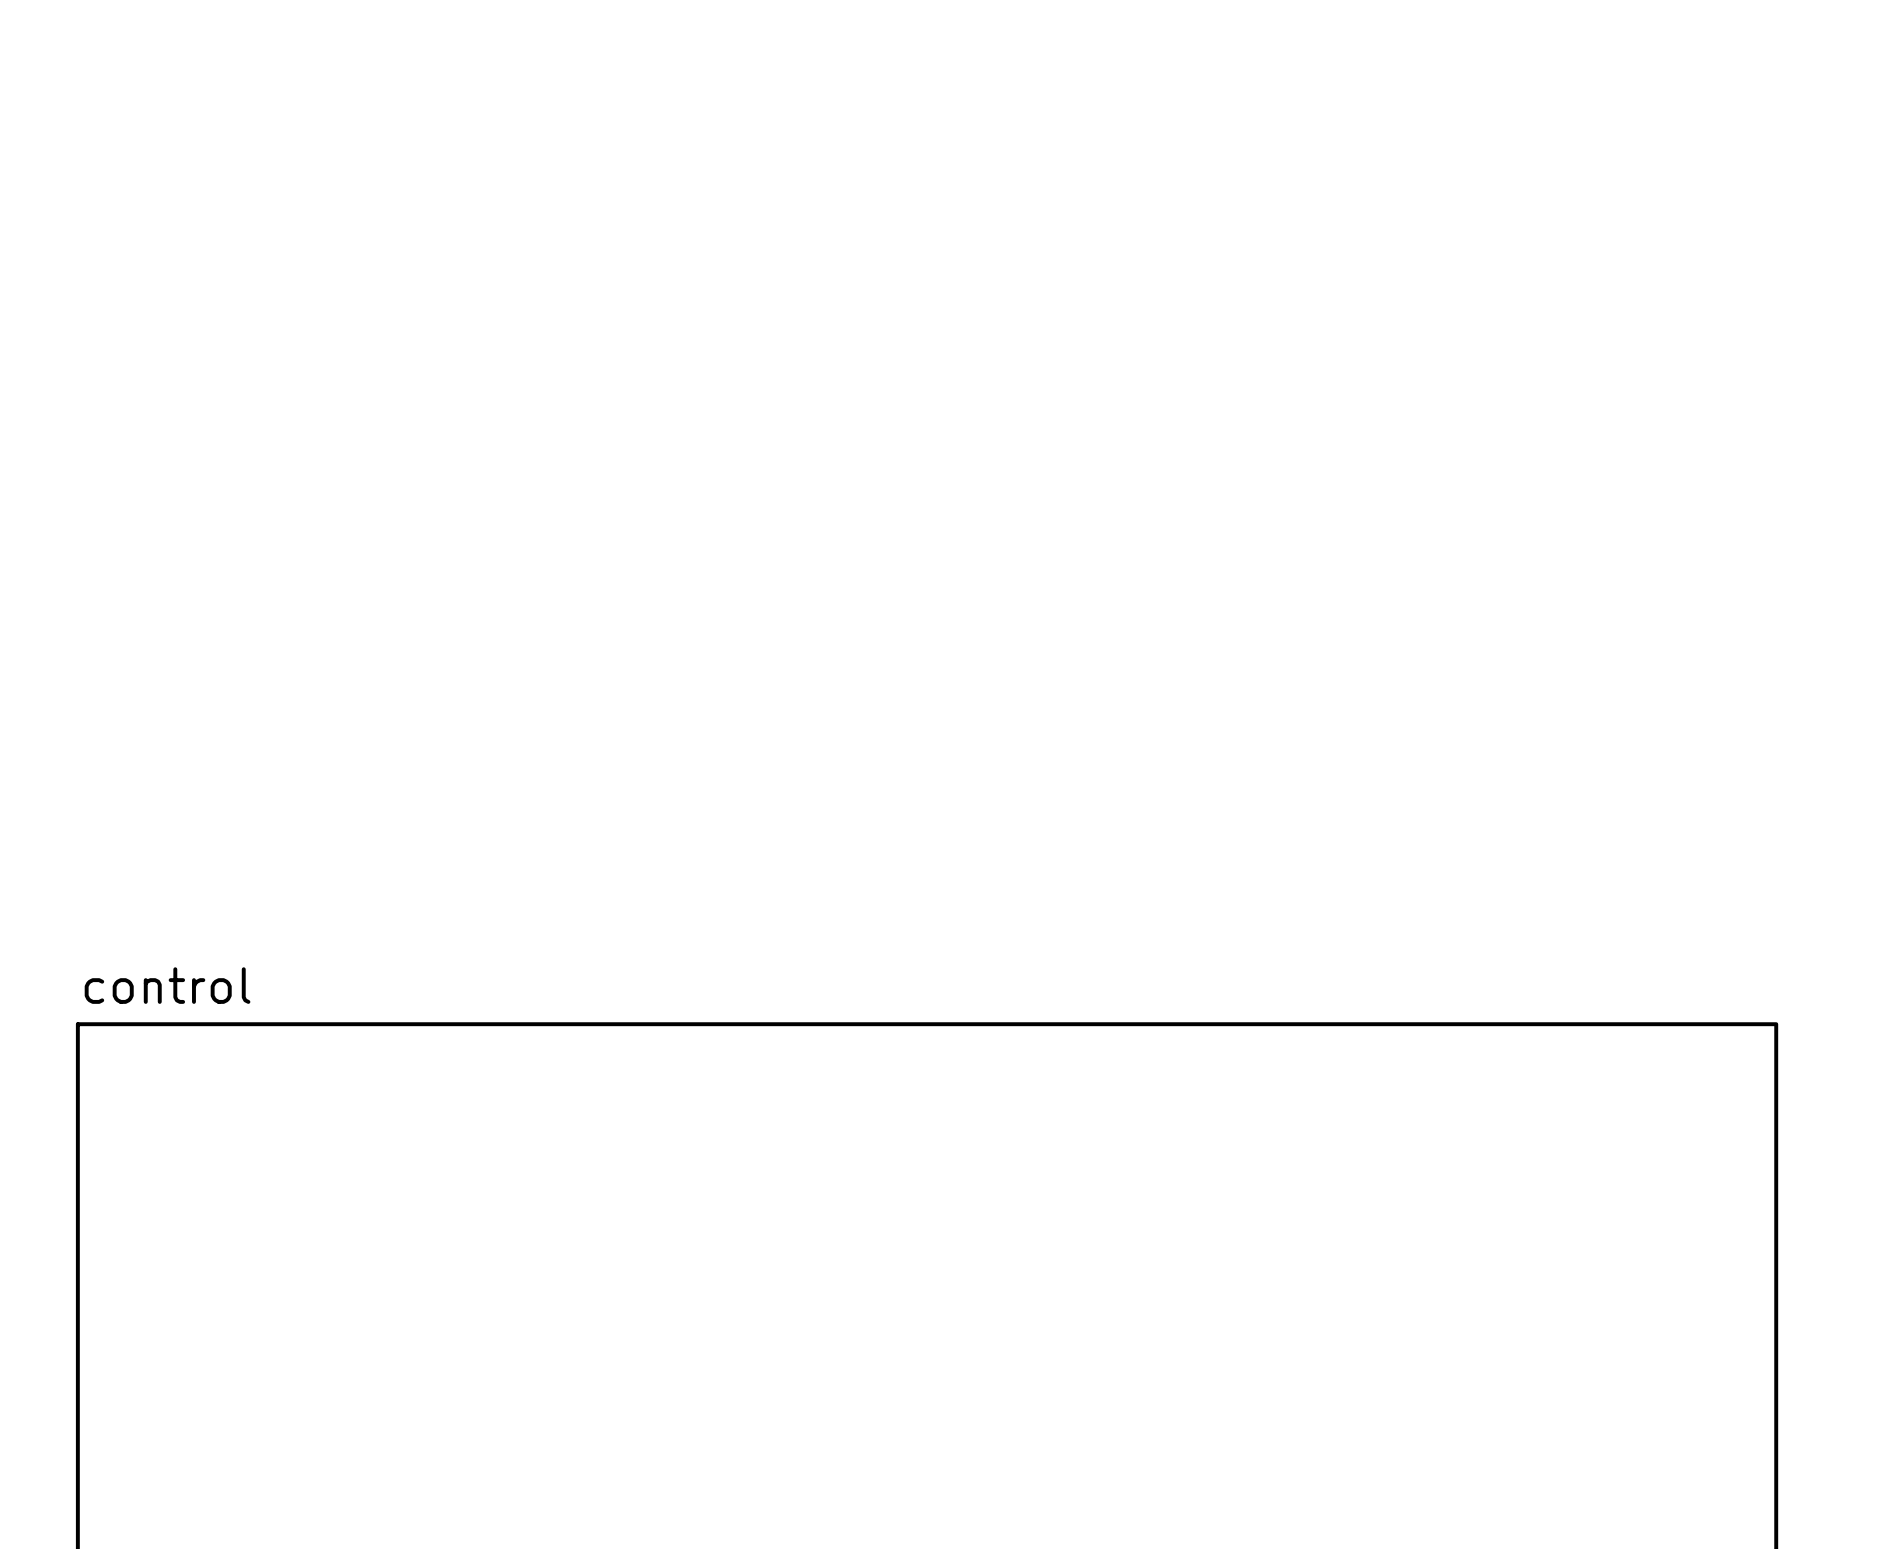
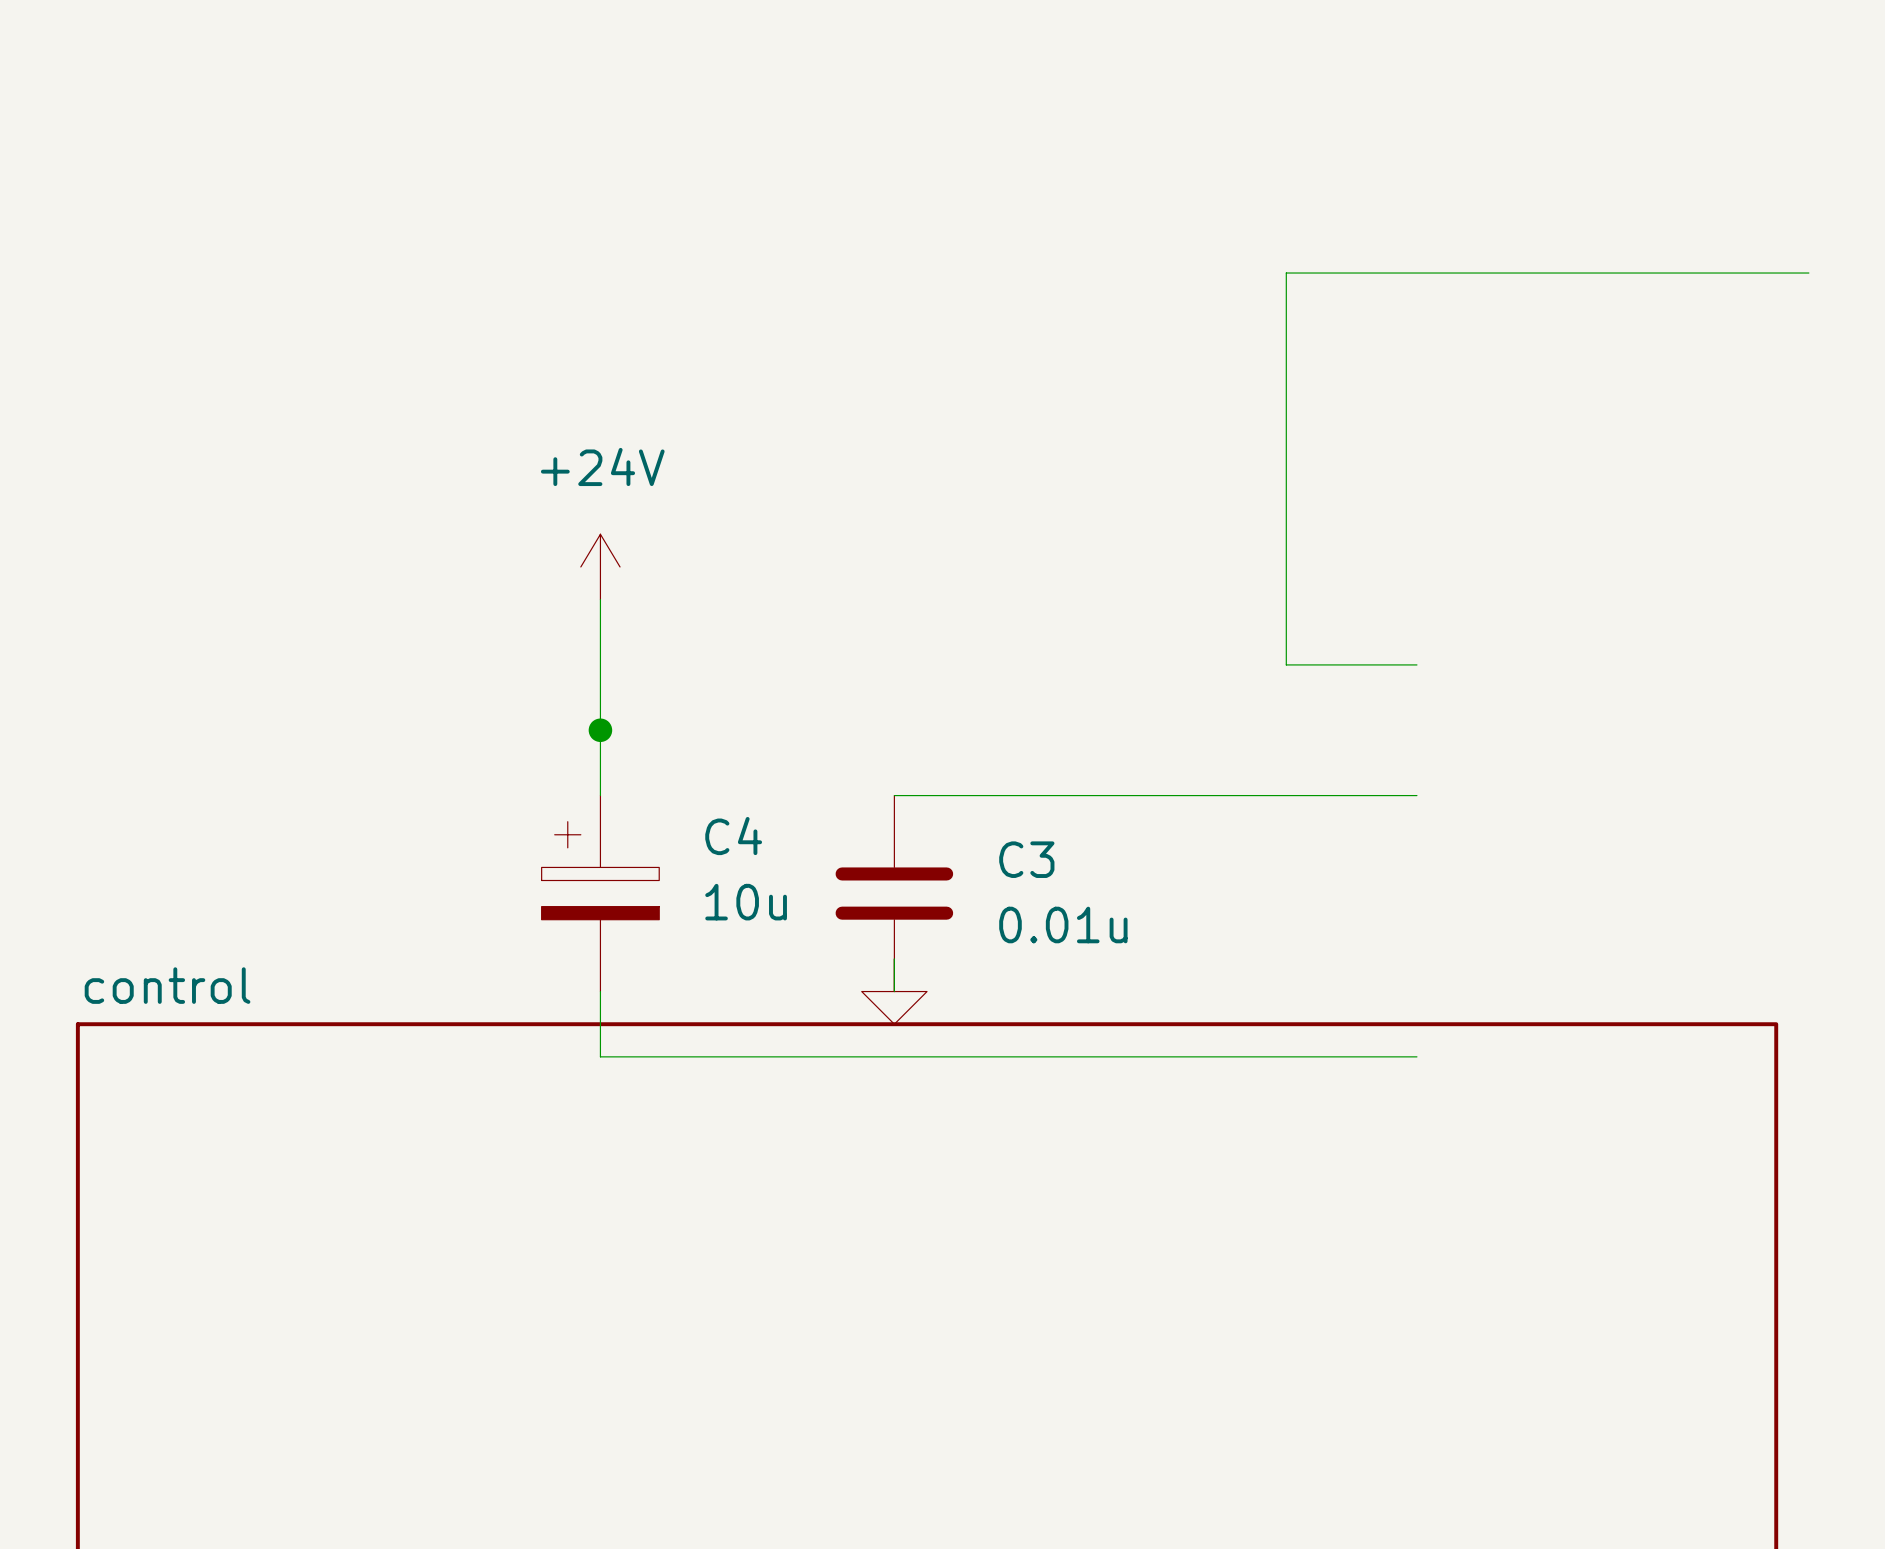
wire: none -> (1808, 273) (1286, 273) (1286, 664) (1416, 664)
power symbol: none -> +24V (600, 566)
wire: none -> (600, 599) (600, 795)
junction: none -> (600, 730)
wire: none -> (894, 795) (1416, 795)
C4: none -> 10u (600, 893)
C3: none -> 0.01u (894, 893)
wire: none -> (894, 958) (894, 991)
wire: none -> (600, 991) (600, 1056) (1416, 1056)
power symbol: none -> (894, 991)

